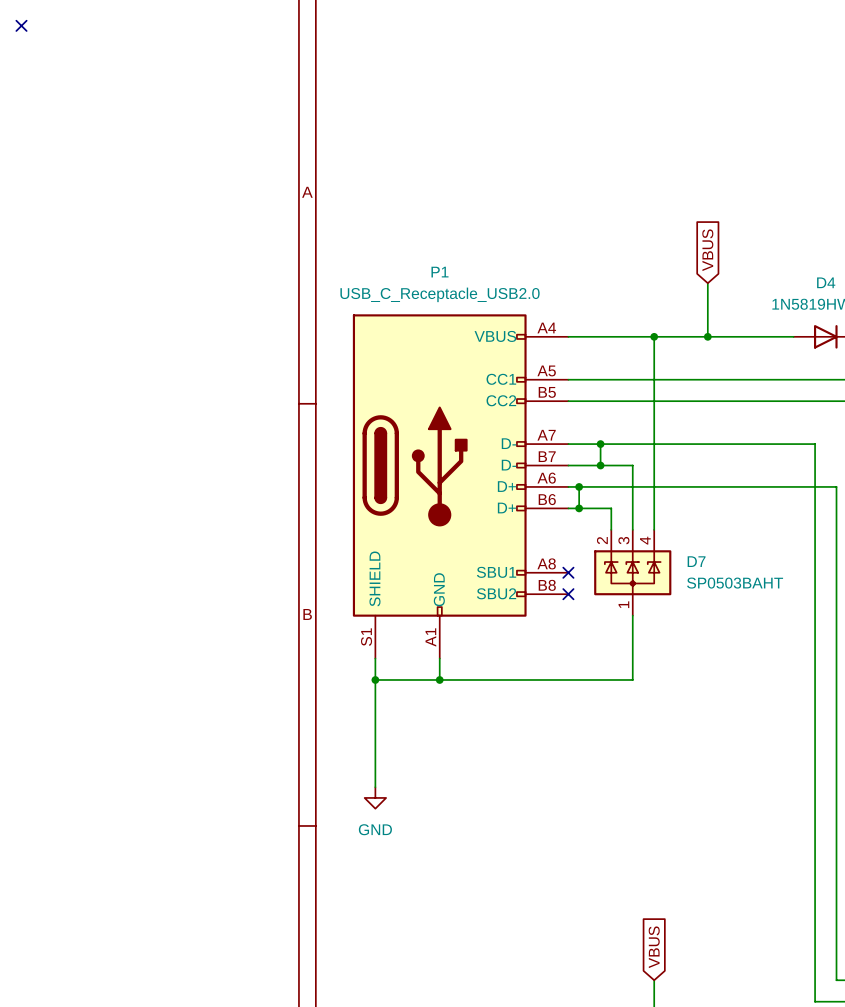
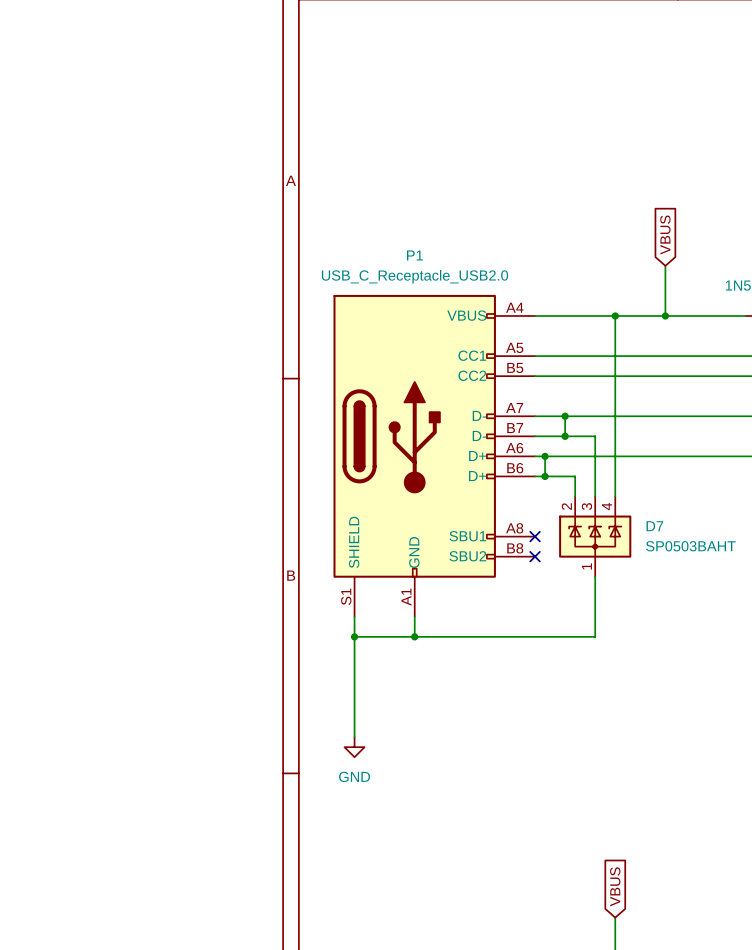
no-connect mark: (21, 25) -> none

